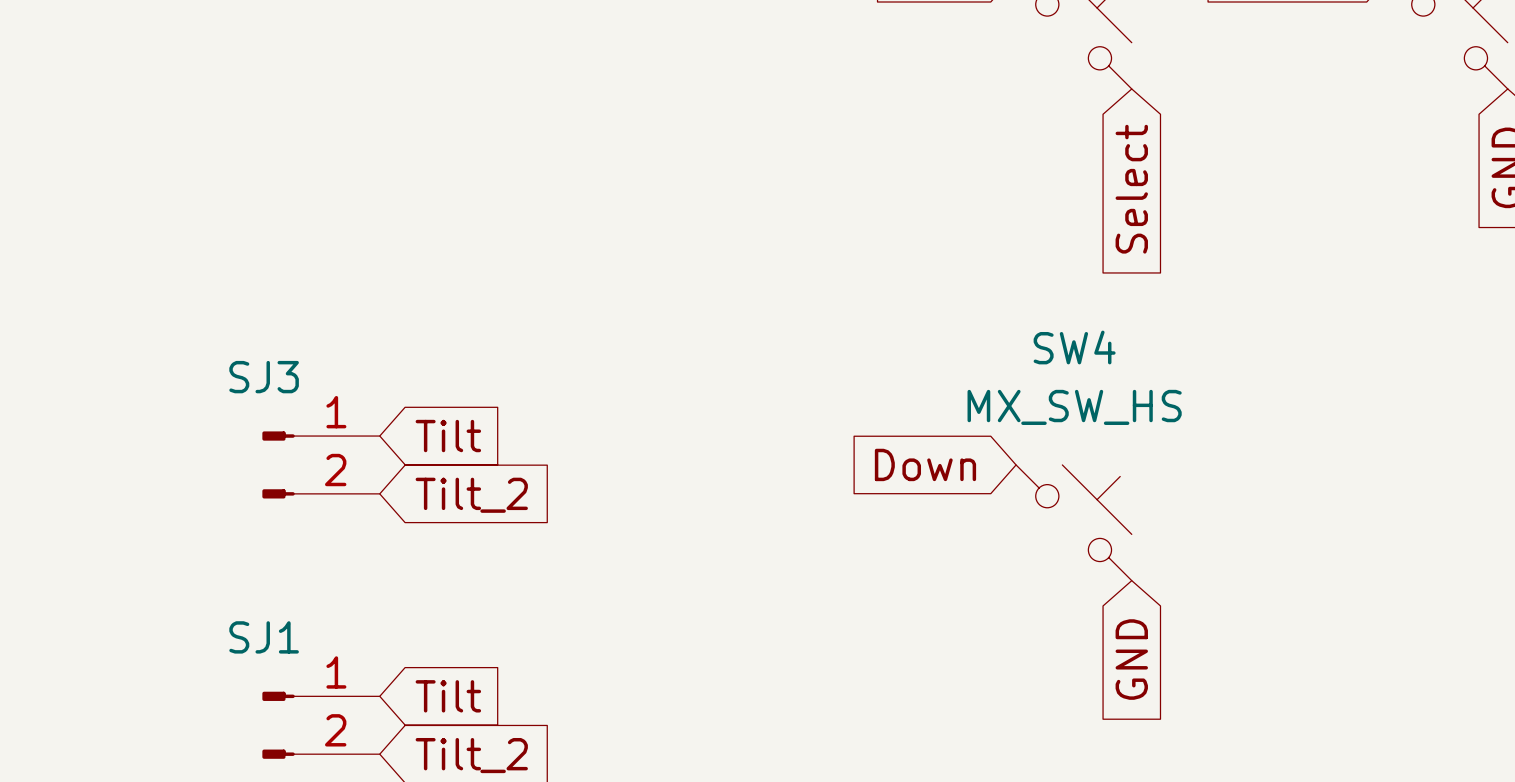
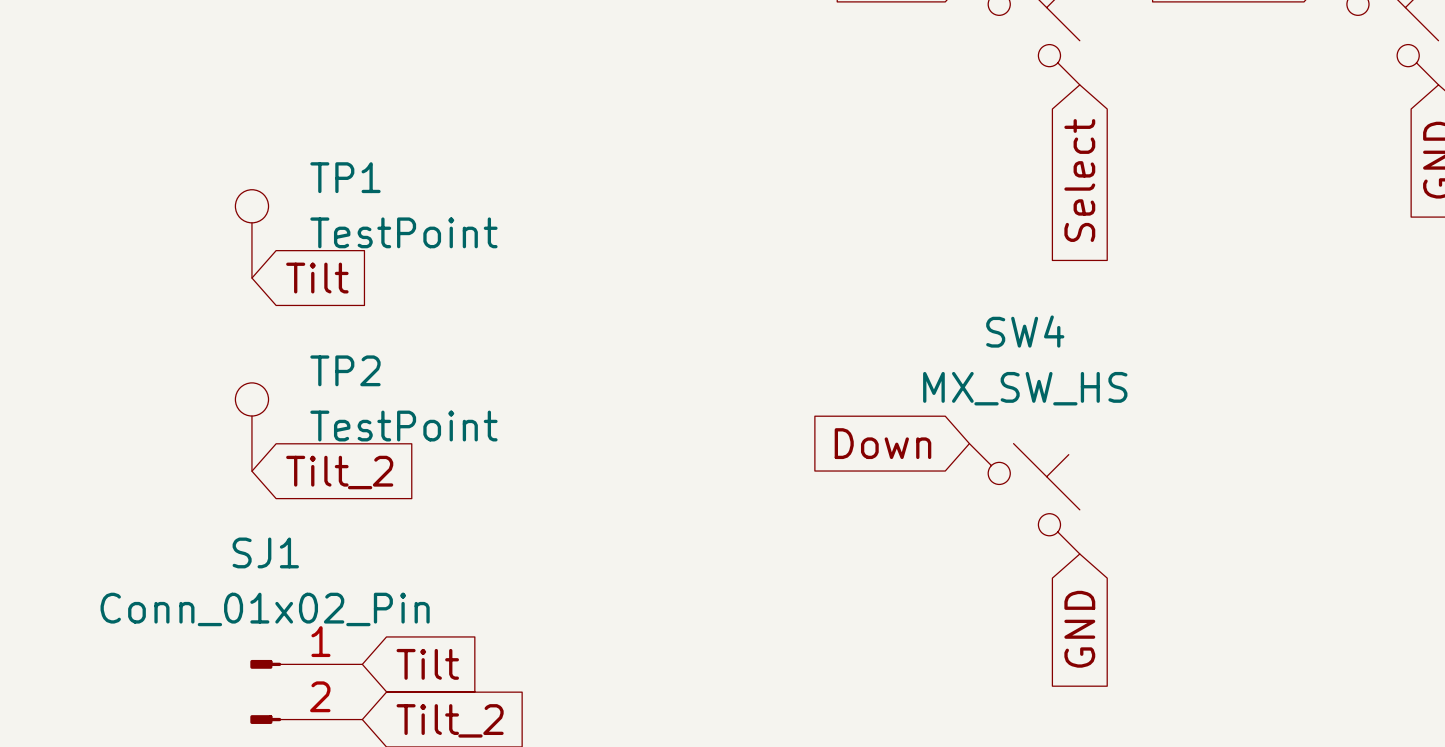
TP1: none -> TestPoint (251, 233)
global label position: Tilt (448, 436) -> Tilt (317, 278)
TP2: none -> TestPoint (251, 427)
SJ3: (321, 464) -> none
global label position: Tilt_2 (471, 495) -> Tilt_2 (339, 472)
SJ1 name position: SJ1 (264, 637) -> SJ1 (265, 552)
SJ1 value: none -> Conn_01x02_Pin (265, 609)

